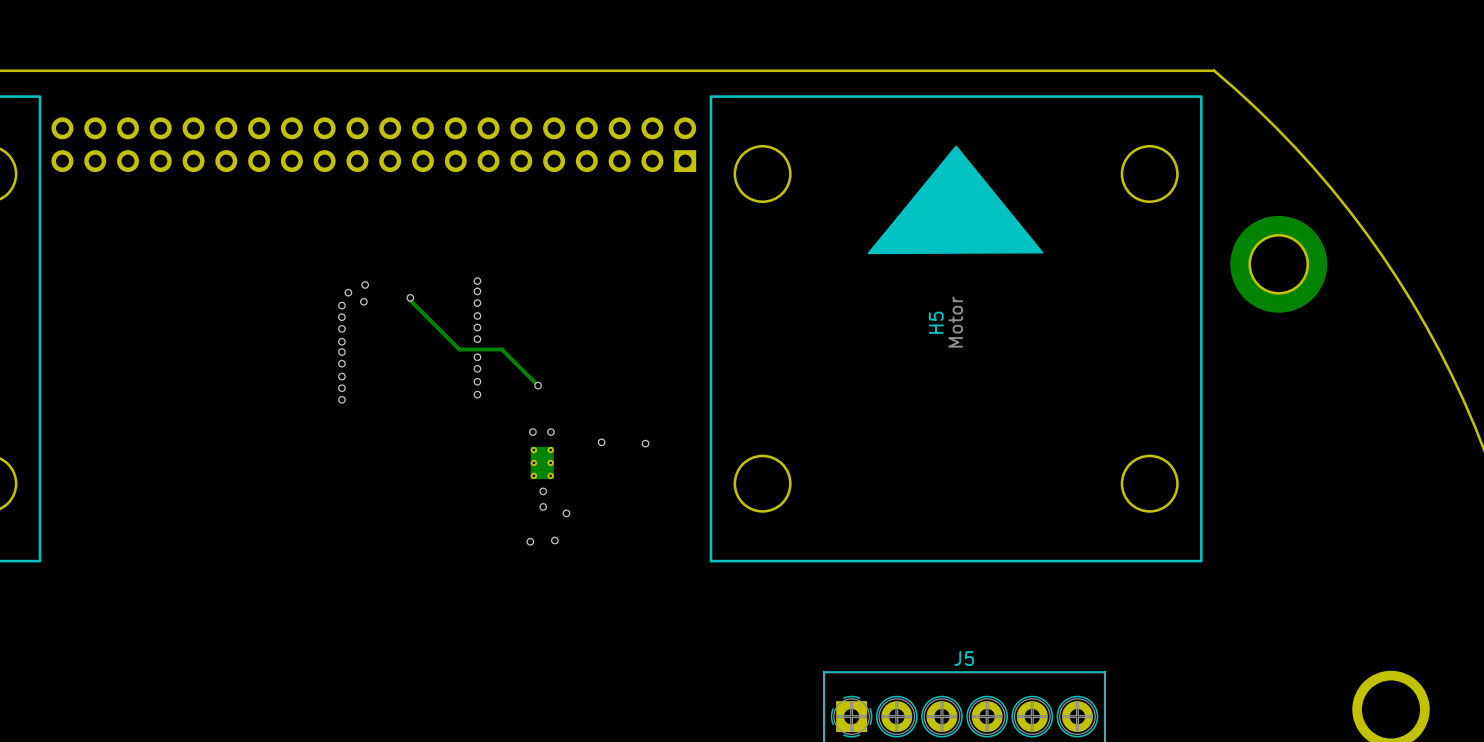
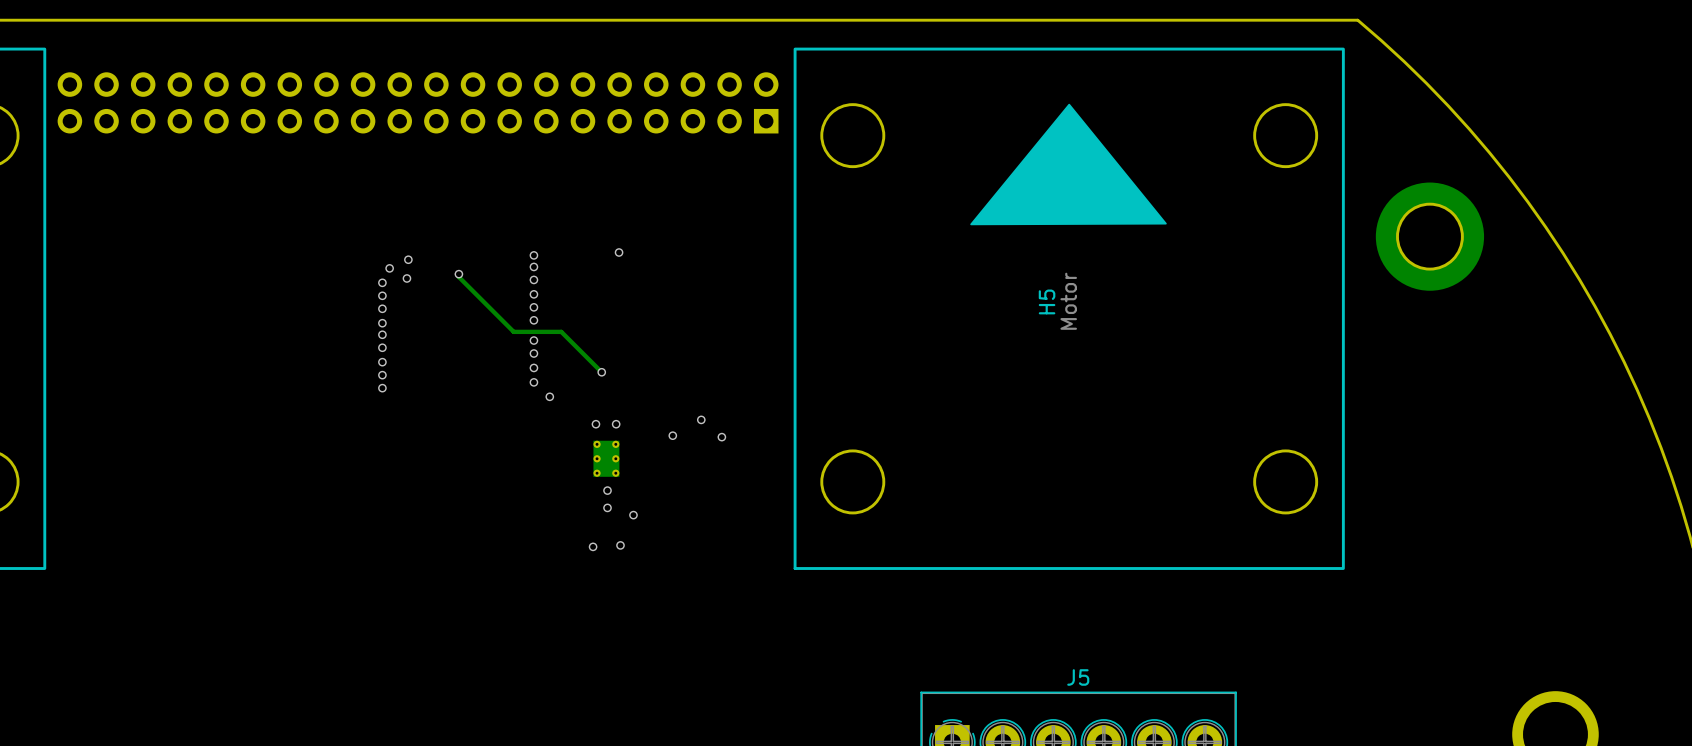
via: none -> (619, 252)
via: none -> (549, 396)
via: none -> (701, 419)

